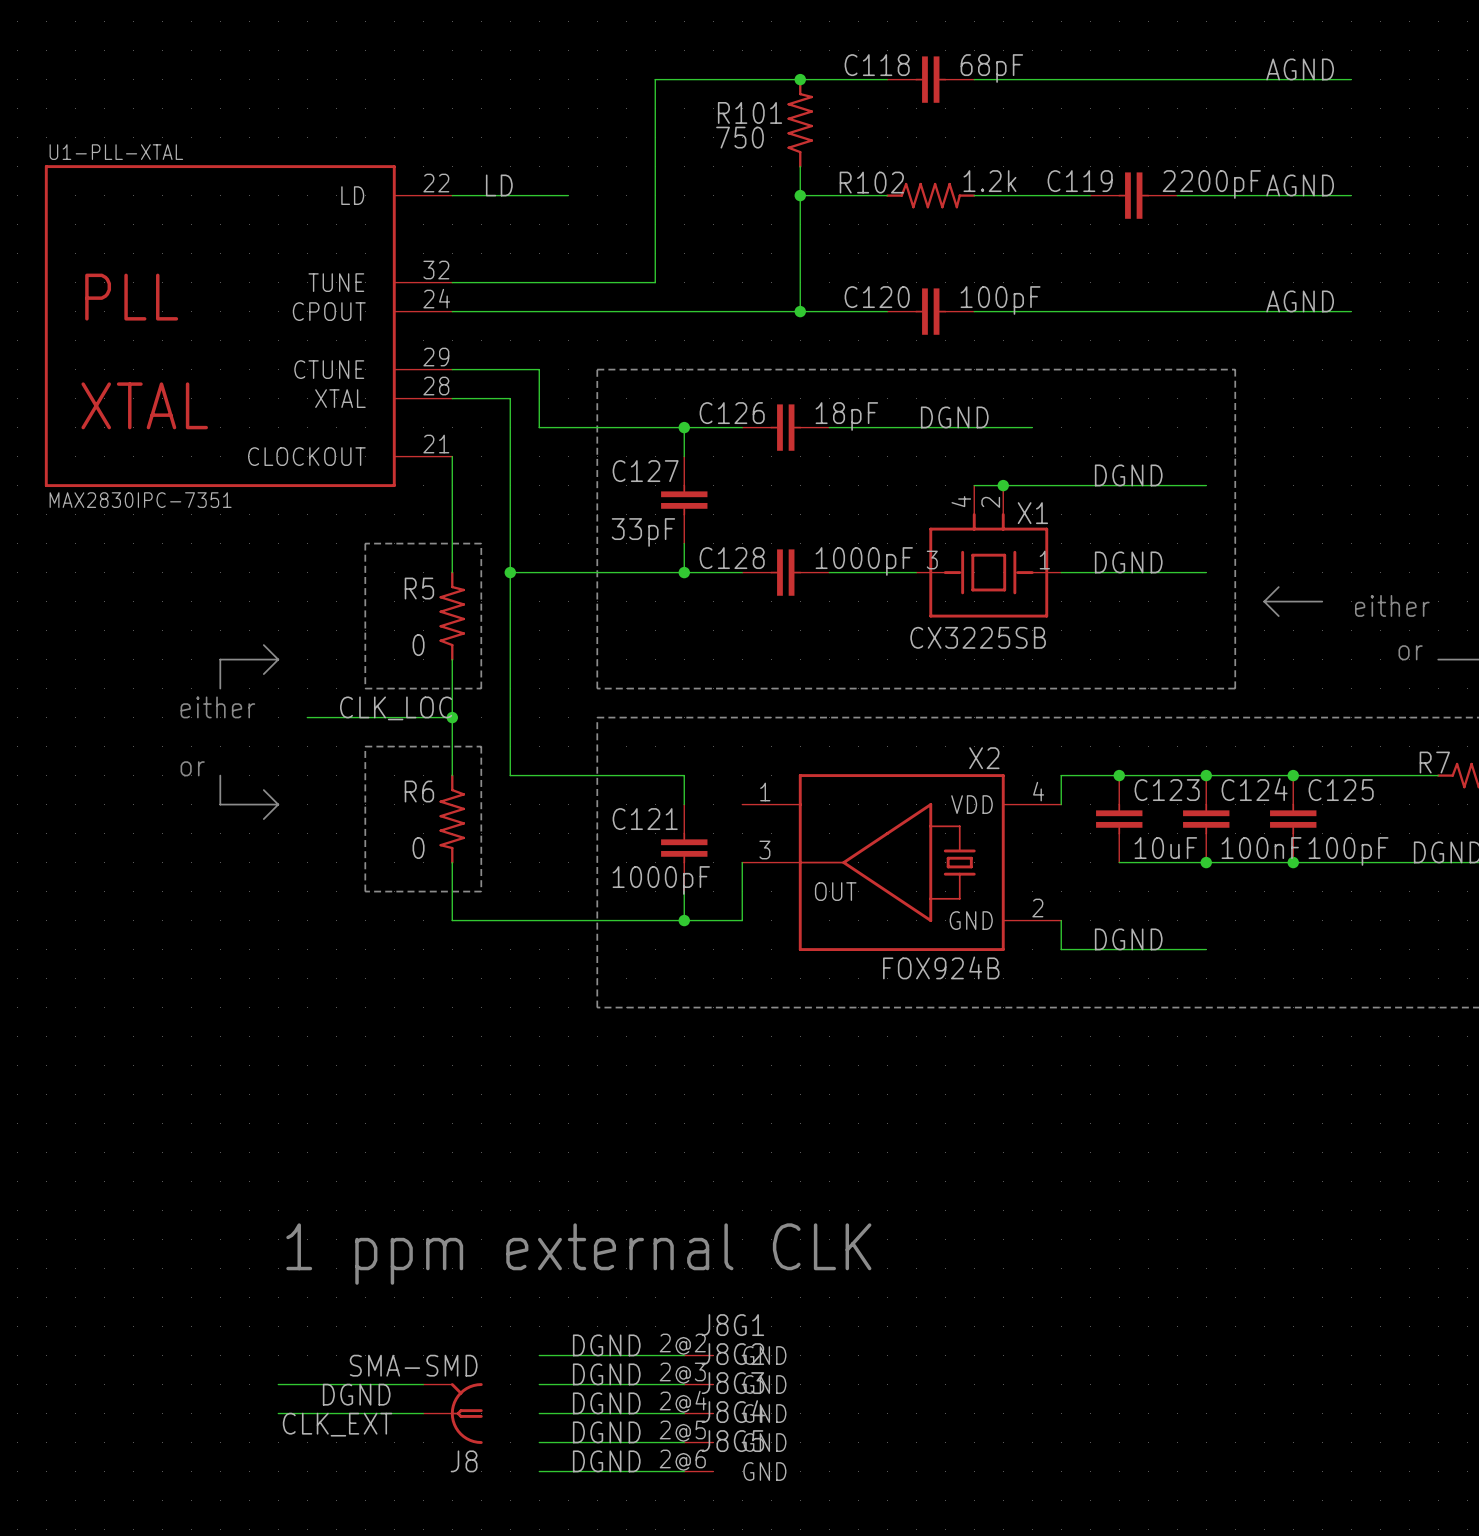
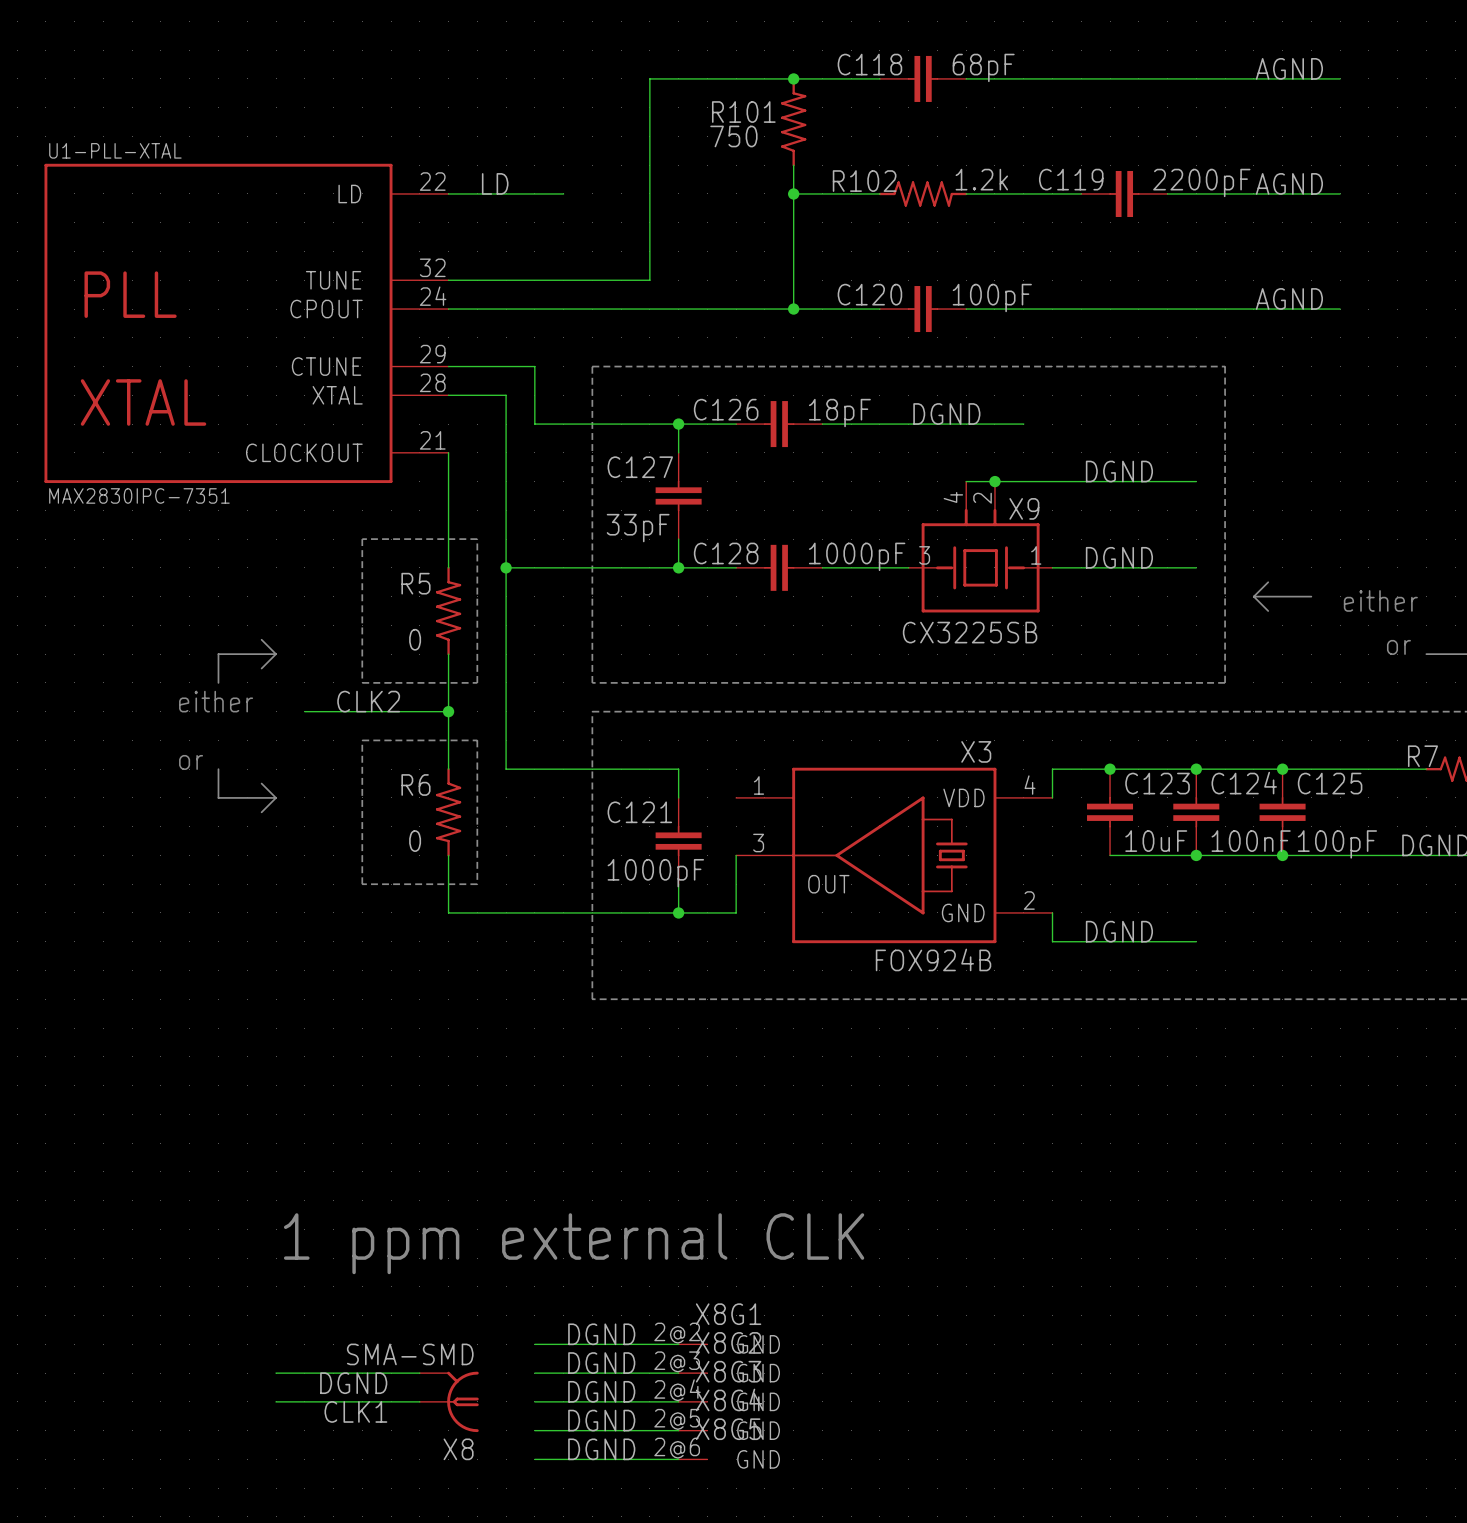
X1 name: X1 (1032, 513) -> X9 (1024, 508)
label: CLK_LOC (396, 708) -> CLK2 (368, 701)
X2 name: X2 (984, 758) -> X3 (976, 751)
J8G1 name: J8G1 (732, 1325) -> X8G1 (728, 1314)
J8G2 name: J8G2 (732, 1354) -> X8G2 (728, 1342)
J8G3 name: J8G3 (732, 1383) -> X8G3 (728, 1371)
J8G4 name: J8G4 (733, 1411) -> X8G4 (729, 1399)
label: CLK_EXT (337, 1424) -> CLK1 (355, 1411)
J8G5 name: J8G5 (732, 1441) -> X8G5 (728, 1429)
J8 name: J8 (464, 1461) -> X8 (458, 1449)

